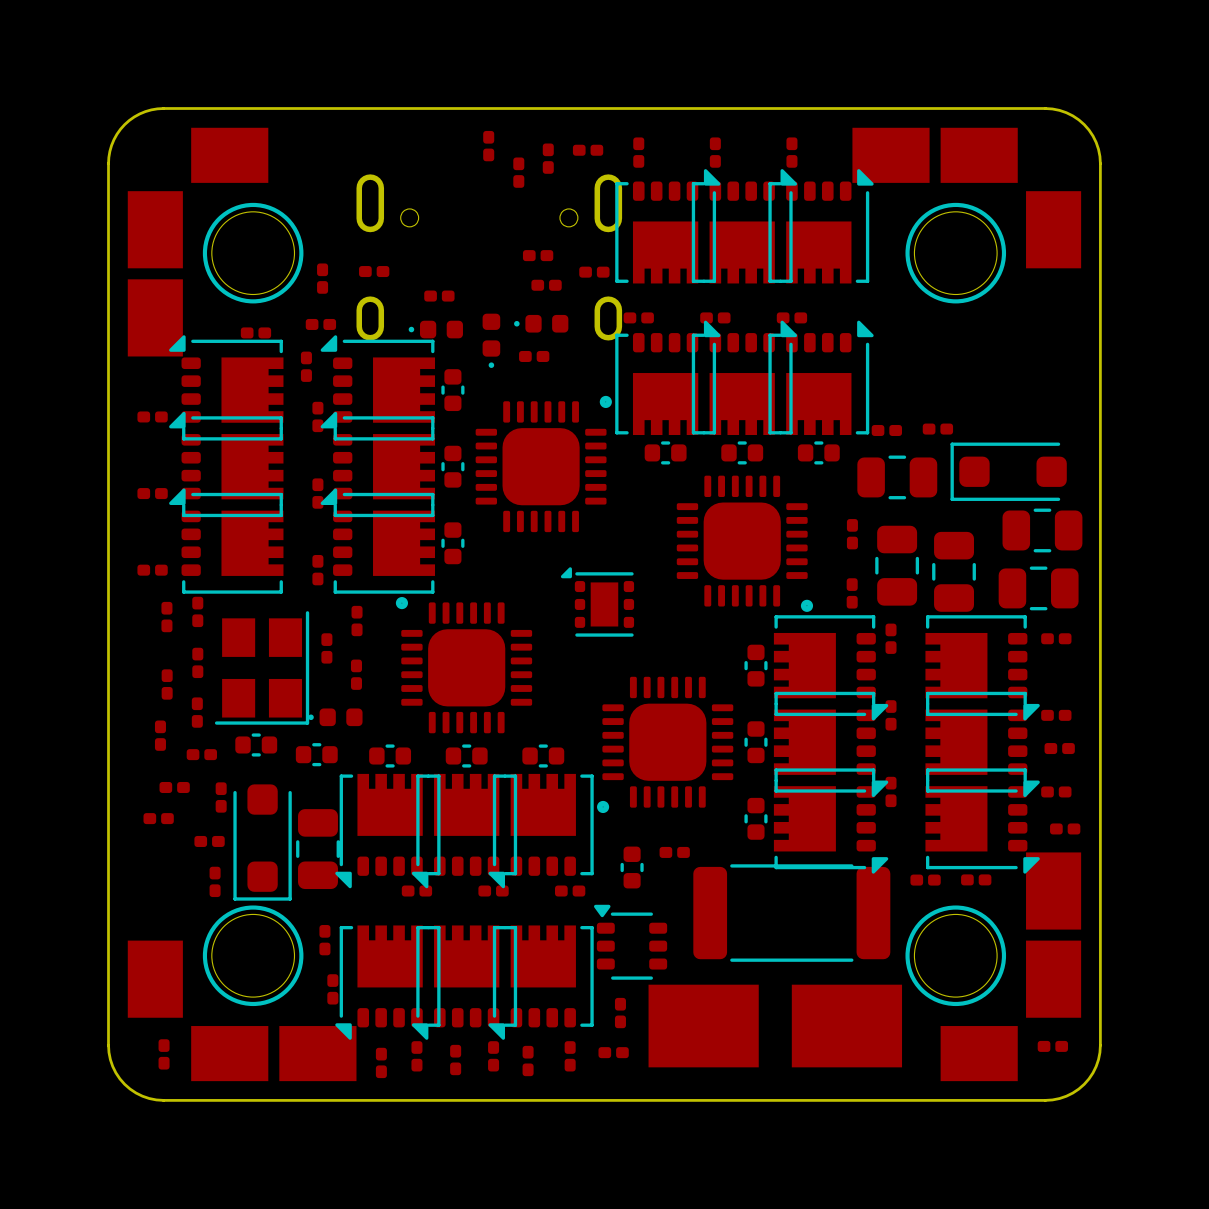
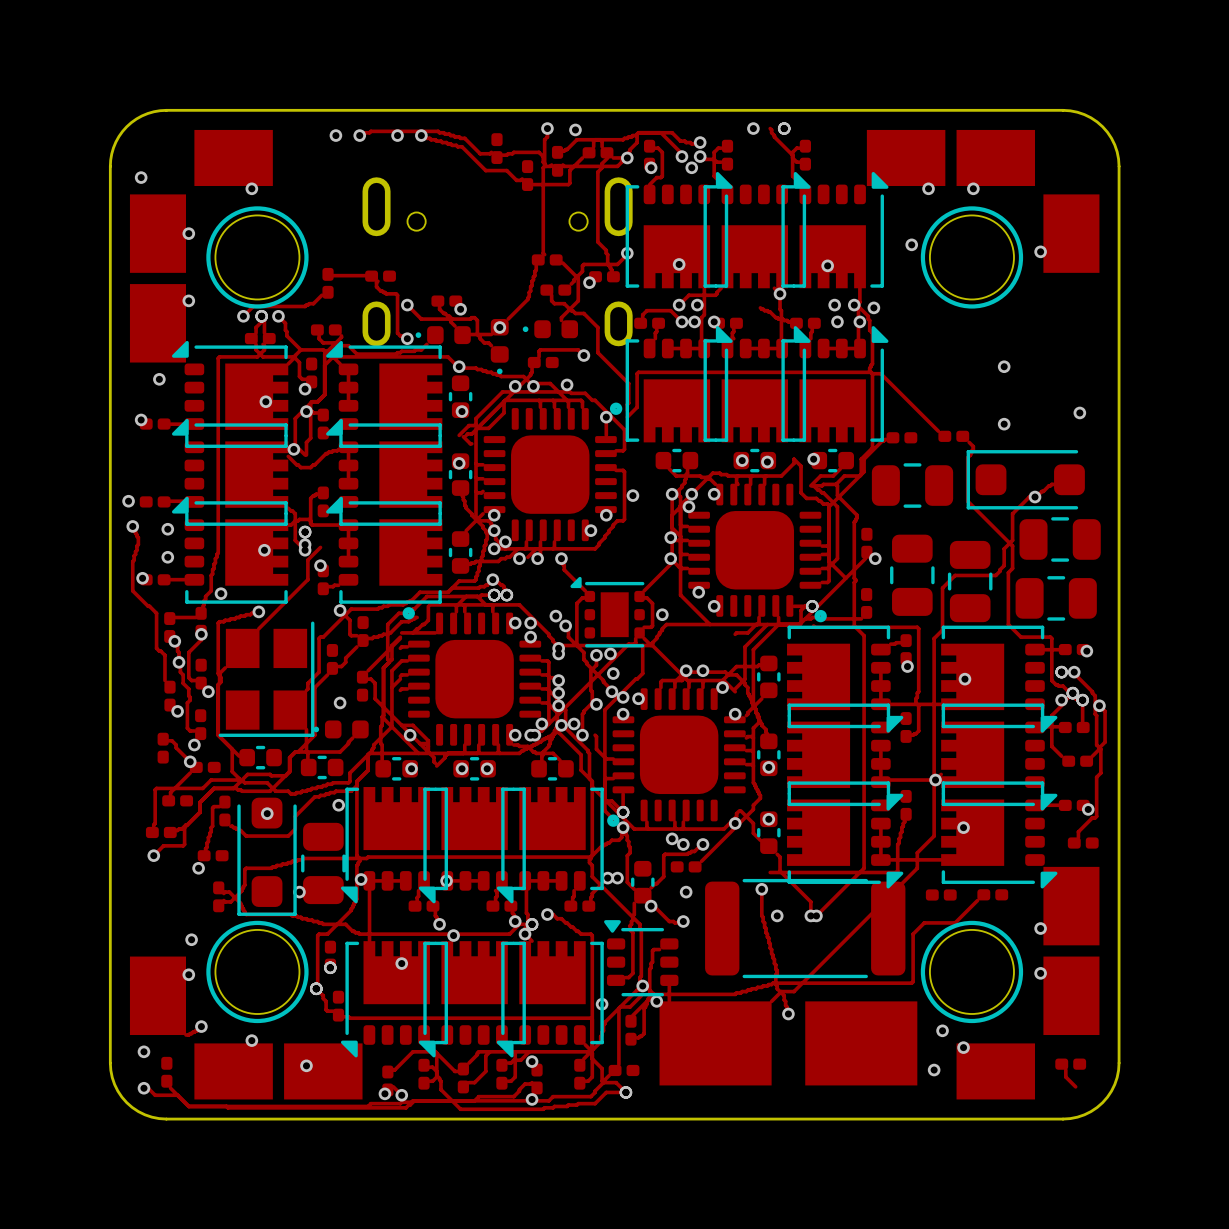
track: none -> (547, 128) (547, 136) (544, 139) (543, 167) (544, 254)
via: none -> (547, 128)
via: none -> (753, 128)
track: none -> (770, 128) (774, 136) (792, 155)
via: none -> (784, 128)
via: none -> (575, 129)
track: none -> (660, 132) (681, 153) (681, 156)
track: none -> (637, 134) (637, 142) (617, 166) (562, 164)
via: none -> (335, 135)
track: none -> (359, 135) (370, 131) (438, 131) (464, 138) (480, 153) (491, 152)
via: none -> (359, 135)
via: none -> (397, 135)
track: none -> (421, 135) (461, 146) (485, 170) (506, 170) (516, 180) (522, 178)
via: none -> (421, 135)
track: none -> (595, 139) (593, 146)
track: none -> (600, 139) (602, 146)
track: none -> (700, 142) (691, 143) (680, 141) (672, 132) (638, 132) (623, 139) (576, 139) (567, 149) (562, 150)
via: none -> (700, 142)
track: none -> (655, 148) (662, 152) (662, 176) (656, 177) (649, 184)
track: none -> (721, 148) (714, 152) (714, 176) (722, 184)
track: none -> (799, 148) (792, 152) (792, 176) (801, 184)
track: none -> (502, 155) (513, 152) (539, 152) (543, 156) (544, 163)
via: none -> (681, 156)
track: none -> (700, 156) (721, 162)
via: none -> (700, 156)
track: none -> (582, 157) (569, 170) (568, 184) (533, 184)
track: none -> (607, 157) (597, 171) (597, 242) (606, 250) (607, 264) (611, 271)
track: none -> (613, 157) (627, 157)
via: none -> (627, 157)
track: none -> (792, 157) (799, 162)
track: none -> (544, 164) (551, 164)
via: none -> (651, 167)
via: none -> (691, 167)
via: none -> (141, 177)
via: none -> (251, 188)
via: none -> (928, 188)
via: none -> (973, 188)
via: none -> (188, 233)
via: none -> (911, 244)
via: none -> (1040, 251)
track: none -> (627, 253) (617, 264) (583, 264) (582, 271) (571, 284)
via: none -> (627, 253)
track: none -> (562, 263) (578, 278) (578, 300) (561, 317) (561, 320)
via: none -> (679, 264)
track: none -> (536, 265) (527, 299) (508, 319)
via: none -> (827, 265)
track: none -> (333, 275) (365, 275)
track: none -> (377, 281) (376, 286) (380, 291) (397, 295) (397, 333) (407, 338)
via: none -> (589, 282)
track: none -> (704, 288) (701, 338)
track: none -> (721, 288) (715, 295) (688, 295) (679, 305)
track: none -> (774, 288) (780, 293) (781, 338)
track: none -> (859, 288) (858, 338)
via: none -> (780, 293)
track: none -> (321, 295) (313, 303) (305, 306) (253, 306) (243, 316)
track: none -> (551, 295) (551, 300) (554, 303) (564, 303) (575, 313) (583, 313) (597, 327) (597, 352) (628, 383) (627, 410)
via: none -> (188, 300)
track: none -> (407, 305) (421, 319) (449, 319) (454, 326)
via: none -> (407, 305)
via: none -> (679, 305)
via: none -> (697, 305)
via: none -> (834, 305)
track: none -> (854, 305) (857, 305) (868, 316) (869, 320) (869, 330) (872, 333) (872, 363) (869, 370) (872, 373)
via: none -> (854, 305)
track: none -> (439, 306) (439, 309) (452, 319) (474, 317) (477, 320) (477, 334) (484, 342) (488, 342) (491, 345)
track: none -> (760, 307) (770, 312) (778, 319) (789, 321)
via: none -> (873, 307)
via: none -> (460, 309)
via: none -> (243, 316)
via: none -> (261, 316)
track: none -> (278, 316) (285, 323) (286, 335) (300, 349)
via: none -> (278, 316)
track: none -> (642, 317) (646, 310) (670, 310) (681, 321)
via: none -> (681, 321)
via: none -> (694, 321)
via: none -> (714, 321)
via: none -> (837, 321)
via: none -> (859, 321)
via: none -> (499, 327)
track: none -> (656, 328) (655, 338)
track: none -> (733, 328) (733, 338)
track: none -> (812, 328) (810, 338)
track: none -> (256, 333) (256, 327) (261, 321) (261, 316) (264, 319) (264, 333)
track: none -> (470, 334) (491, 334)
track: none -> (319, 335) (323, 342) (348, 345) (356, 354) (396, 354) (401, 351) (421, 349) (426, 344)
track: none -> (341, 335) (324, 354) (324, 394) (317, 401) (312, 401) (295, 418) (295, 445) (305, 454)
via: none -> (407, 338)
track: none -> (256, 344) (256, 349) (263, 356) (293, 356) (299, 362) (299, 376) (302, 379) (306, 379)
track: none -> (263, 344) (264, 349) (257, 356) (218, 358) (218, 553) (211, 575) (211, 590) (205, 596) (202, 606)
track: none -> (673, 348) (680, 348)
track: none -> (691, 348) (698, 348)
track: none -> (752, 348) (757, 348)
track: none -> (770, 348) (775, 348)
track: none -> (829, 348) (836, 348)
track: none -> (847, 348) (854, 348)
track: none -> (300, 349) (327, 351) (340, 363)
track: none -> (300, 349) (288, 363)
track: none -> (583, 355) (578, 349) (540, 349) (539, 356)
via: none -> (583, 355)
track: none -> (324, 365) (333, 356) (447, 356) (459, 368) (476, 368) (501, 376) (523, 376) (530, 383) (550, 383) (568, 401) (568, 407)
via: none -> (459, 366)
via: none -> (1004, 366)
track: none -> (532, 368) (530, 375) (471, 433) (466, 435)
track: none -> (871, 372) (638, 372) (637, 407) (627, 417)
track: none -> (872, 373) (872, 447) (861, 459) (861, 474)
track: none -> (872, 373) (880, 373) (938, 431)
track: none -> (348, 375) (348, 382)
via: none -> (159, 379)
via: none -> (567, 384)
via: none -> (515, 386)
via: none -> (533, 386)
via: none -> (305, 389)
track: none -> (348, 393) (348, 400)
track: none -> (505, 400) (581, 400) (582, 407)
track: none -> (539, 400) (540, 407)
track: none -> (553, 400) (554, 407)
via: none -> (265, 401)
track: none -> (504, 401) (504, 412) (488, 428) (477, 428)
track: none -> (310, 403) (310, 438) (306, 442) (306, 454)
track: none -> (306, 411) (317, 412)
via: none -> (306, 411)
via: none -> (461, 411)
via: none -> (1079, 412)
track: none -> (606, 417) (606, 435)
via: none -> (606, 417)
via: none -> (141, 419)
track: none -> (170, 424) (184, 424)
via: none -> (1004, 424)
track: none -> (476, 429) (476, 519)
track: none -> (459, 435) (469, 425) (476, 424) (476, 418) (502, 391) (585, 393) (592, 400) (595, 400) (624, 429) (624, 449) (616, 450)
track: none -> (463, 436) (471, 443)
track: none -> (886, 439) (882, 440) (864, 459) (864, 471) (829, 506)
track: none -> (969, 442) (973, 449) (967, 457) (967, 501) (1012, 546) (1012, 568) (1008, 572) (1008, 624) (1020, 637) (1051, 638) (1051, 680) (1056, 684) (1063, 686) (1075, 698) (1082, 700) (1082, 722)
via: none -> (293, 449)
track: none -> (338, 449) (326, 453) (310, 467) (300, 467) (288, 456)
track: none -> (348, 453) (348, 459)
via: none -> (813, 459)
via: none -> (742, 460)
via: none -> (767, 461)
via: none -> (459, 463)
track: none -> (476, 463) (483, 464)
track: none -> (669, 469) (676, 476) (707, 477) (715, 484)
track: none -> (687, 469) (684, 483) (679, 490) (680, 595) (709, 624)
track: none -> (840, 469) (833, 476) (820, 476) (810, 485)
track: none -> (616, 470) (624, 471) (624, 519) (617, 520) (613, 525) (595, 548) (494, 548)
track: none -> (348, 471) (348, 477)
track: none -> (737, 476) (737, 484)
track: none -> (752, 476) (750, 484)
track: none -> (766, 476) (764, 484)
track: none -> (859, 476) (844, 476) (836, 484)
track: none -> (476, 477) (483, 478)
track: none -> (836, 484) (837, 495) (857, 515) (854, 522) (854, 625) (864, 635) (864, 868) (816, 915)
track: none -> (836, 484) (812, 485)
track: none -> (1054, 484) (1049, 485) (1039, 494) (1029, 497) (1012, 513) (1012, 540) (1004, 548) (1004, 565) (995, 575) (955, 575) (942, 588) (942, 630) (934, 638) (934, 836) (917, 852) (917, 868) (794, 991) (781, 991) (771, 1001)
track: none -> (813, 485) (837, 506) (837, 558) (827, 568) (822, 568)
track: none -> (476, 491) (483, 491)
track: none -> (317, 494) (310, 498) (310, 523) (338, 525)
track: none -> (672, 494) (672, 562) (644, 590)
via: none -> (672, 494)
via: none -> (691, 494)
via: none -> (714, 494)
track: none -> (461, 495) (466, 508) (487, 533) (476, 579) (459, 581) (447, 592) (419, 592) (411, 600) (403, 604) (389, 604) (377, 609) (351, 609) (323, 637) (319, 638) (319, 672) (307, 683) (306, 690)
via: none -> (632, 495)
via: none -> (1035, 497)
via: none -> (128, 501)
track: none -> (170, 501) (184, 501)
track: none -> (680, 505) (712, 473) (728, 476) (781, 476) (794, 463) (794, 459) (801, 466) (801, 492) (806, 498) (816, 498) (829, 505) (829, 581) (822, 582)
track: none -> (680, 506) (672, 515)
via: none -> (688, 506)
track: none -> (288, 508) (295, 513) (295, 540) (305, 550)
track: none -> (483, 513) (466, 530)
via: none -> (494, 515)
via: none -> (606, 515)
track: none -> (310, 520) (299, 519) (288, 525)
track: none -> (477, 520) (488, 520) (495, 530) (495, 539) (505, 548)
track: none -> (680, 525) (687, 526)
track: none -> (132, 526) (138, 537) (138, 544) (132, 561) (132, 590) (156, 613) (156, 648) (164, 655) (164, 680)
via: none -> (132, 526)
track: none -> (672, 527) (680, 536)
via: none -> (167, 529)
track: none -> (348, 530) (348, 537)
via: none -> (494, 530)
via: none -> (590, 530)
via: none -> (305, 532)
track: none -> (670, 537) (673, 540) (687, 540)
via: none -> (670, 537)
via: none -> (505, 541)
track: none -> (526, 541) (525, 548)
track: none -> (540, 541) (540, 555) (537, 558)
track: none -> (554, 541) (553, 548)
via: none -> (305, 544)
track: none -> (822, 546) (829, 547)
track: none -> (320, 547) (307, 560) (307, 579) (258, 628)
track: none -> (348, 548) (348, 555)
via: none -> (494, 548)
track: none -> (518, 548) (509, 557) (501, 558) (498, 561) (476, 561) (469, 564)
track: none -> (536, 548) (527, 557)
via: none -> (264, 550)
via: none -> (305, 550)
track: none -> (680, 553) (687, 554)
track: none -> (829, 553) (822, 554)
via: none -> (167, 557)
via: none -> (519, 558)
via: none -> (537, 558)
track: none -> (561, 558) (564, 569) (585, 590)
via: none -> (561, 558)
track: none -> (670, 558) (679, 567) (687, 568)
via: none -> (670, 558)
track: none -> (865, 558) (799, 624) (666, 624) (651, 645) (557, 645) (519, 604) (429, 604)
via: none -> (875, 558)
track: none -> (829, 561) (845, 578)
via: none -> (320, 565)
via: none -> (142, 578)
track: none -> (170, 579) (184, 579)
via: none -> (492, 579)
track: none -> (338, 585) (328, 586)
track: none -> (452, 588) (478, 588) (490, 582) (498, 582) (504, 586) (506, 595)
via: none -> (698, 592)
via: none -> (221, 593)
track: none -> (494, 595) (426, 596) (414, 609) (405, 613) (398, 613) (387, 624) (389, 662)
via: none -> (494, 595)
via: none -> (506, 595)
track: none -> (466, 596) (456, 606) (456, 611)
track: none -> (477, 596) (485, 604)
track: none -> (585, 597) (582, 597) (576, 603) (578, 645)
track: none -> (644, 597) (646, 597) (652, 603) (652, 625) (644, 627)
track: none -> (463, 604) (464, 611)
track: none -> (491, 604) (492, 611)
track: none -> (428, 606) (428, 620) (412, 632)
via: none -> (714, 606)
track: none -> (794, 606) (812, 606)
track: none -> (805, 606) (801, 610) (801, 623)
via: none -> (812, 606)
track: none -> (340, 610) (349, 620) (349, 634) (356, 635)
via: none -> (340, 610)
track: none -> (258, 611) (218, 623) (219, 674)
via: none -> (258, 611)
via: none -> (662, 614)
via: none -> (555, 616)
track: none -> (174, 617) (195, 617)
track: none -> (417, 617) (408, 621) (401, 621) (387, 634) (368, 638)
track: none -> (759, 617) (757, 624)
track: none -> (778, 617) (780, 624)
track: none -> (805, 618) (861, 618)
via: none -> (515, 623)
via: none -> (530, 623)
track: none -> (756, 624) (747, 632) (735, 634)
track: none -> (767, 624) (745, 646) (745, 679) (735, 688)
track: none -> (778, 624) (753, 649) (754, 707)
track: none -> (565, 625) (568, 628) (568, 637) (583, 652) (583, 659) (586, 663) (611, 691)
via: none -> (565, 625)
track: none -> (813, 625) (918, 628) (918, 691) (915, 698) (915, 702) (918, 705) (918, 730) (911, 735)
track: none -> (401, 632) (435, 632)
via: none -> (201, 634)
track: none -> (201, 637) (201, 639) (188, 652) (188, 677) (191, 680) (195, 680)
track: none -> (400, 637) (391, 645) (391, 659) (383, 667) (383, 718) (418, 753)
via: none -> (530, 637)
track: none -> (400, 638) (368, 670)
track: none -> (635, 638) (634, 644) (628, 644) (541, 730) (534, 735)
track: none -> (644, 638) (687, 680) (723, 680) (735, 691)
via: none -> (174, 641)
track: none -> (174, 642) (180, 658) (180, 672) (183, 674) (183, 683) (188, 688) (190, 697) (187, 702) (187, 728) (190, 730) (194, 730)
track: none -> (900, 642) (890, 644)
track: none -> (642, 645) (642, 673) (604, 709) (604, 810) (625, 831) (630, 847) (630, 852) (627, 855) (627, 882) (634, 889)
track: none -> (356, 646) (345, 658) (345, 662) (338, 666)
track: none -> (407, 646) (400, 648)
via: none -> (558, 648)
track: none -> (1044, 649) (1058, 649)
via: none -> (1086, 651)
via: none -> (558, 653)
via: none -> (610, 653)
track: none -> (596, 655) (596, 665) (590, 670) (592, 702) (582, 714) (582, 735)
via: none -> (596, 655)
track: none -> (407, 660) (401, 660) (391, 670) (391, 726) (373, 745) (372, 750) (349, 773) (348, 782) (333, 782) (291, 794) (288, 791) (275, 791) (267, 782) (244, 782) (239, 780)
track: none -> (541, 660) (548, 662) (548, 723)
via: none -> (178, 662)
track: none -> (760, 665) (736, 666) (722, 680)
via: none -> (907, 666)
track: none -> (225, 667) (219, 673) (219, 683)
track: none -> (686, 670) (674, 681) (674, 687)
via: none -> (686, 670)
via: none -> (702, 670)
via: none -> (1061, 672)
track: none -> (1074, 672) (1095, 695) (1096, 745) (1100, 749) (1100, 773) (1096, 777) (1096, 816) (1092, 817) (1078, 831) (1078, 837)
via: none -> (1074, 672)
via: none -> (613, 673)
track: none -> (880, 673) (880, 680)
track: none -> (327, 674) (314, 687) (314, 735) (298, 752)
track: none -> (407, 674) (400, 676)
track: none -> (541, 674) (555, 677) (558, 680)
track: none -> (219, 676) (221, 681) (218, 684) (218, 735) (239, 756)
track: none -> (368, 679) (375, 683) (375, 698) (433, 757) (435, 763)
track: none -> (400, 679) (391, 687)
via: none -> (964, 679)
via: none -> (558, 680)
track: none -> (690, 680) (688, 687)
track: none -> (704, 680) (702, 687)
track: none -> (660, 687) (662, 680) (681, 680) (690, 672) (725, 672) (728, 674) (736, 674) (747, 687) (747, 693) (759, 718)
via: none -> (722, 687)
track: none -> (407, 688) (400, 690)
track: none -> (541, 688) (547, 688) (565, 709) (565, 728) (588, 750) (589, 778)
via: none -> (208, 691)
via: none -> (611, 691)
track: none -> (880, 691) (880, 698)
via: none -> (558, 693)
track: none -> (1072, 693) (1051, 715) (1051, 746) (1061, 756)
via: none -> (1072, 693)
via: none -> (623, 697)
via: none -> (638, 698)
track: none -> (761, 698) (746, 715)
via: none -> (1061, 700)
via: none -> (1082, 700)
via: none -> (340, 702)
track: none -> (541, 702) (547, 702) (557, 712) (557, 726) (554, 733) (519, 753) (369, 753)
via: none -> (596, 704)
track: none -> (890, 704) (941, 704)
via: none -> (558, 705)
track: none -> (1099, 705) (1105, 711) (1105, 742) (1092, 756)
via: none -> (1099, 705)
via: none -> (177, 711)
via: none -> (623, 714)
via: none -> (735, 714)
track: none -> (383, 715) (380, 726) (382, 760)
track: none -> (757, 715) (759, 722) (753, 728) (753, 782) (760, 798) (753, 805) (753, 809) (701, 861)
track: none -> (759, 719) (767, 733)
via: none -> (541, 723)
via: none -> (574, 723)
track: none -> (401, 725) (412, 725) (428, 740) (428, 752)
via: none -> (561, 725)
track: none -> (1044, 726) (1058, 726)
track: none -> (306, 729) (307, 759)
via: none -> (410, 735)
via: none -> (515, 735)
via: none -> (530, 735)
via: none -> (534, 735)
via: none -> (582, 735)
track: none -> (595, 735) (596, 749) (606, 759) (613, 759)
track: none -> (352, 737) (340, 752) (295, 752) (289, 757) (289, 771) (270, 791) (214, 788) (200, 802) (200, 812) (184, 827) (184, 844) (163, 845) (153, 855)
track: none -> (746, 737) (753, 737)
track: none -> (169, 740) (176, 745) (176, 747) (190, 761)
track: none -> (419, 743) (425, 743) (428, 746)
via: none -> (194, 745)
track: none -> (464, 745) (463, 753)
track: none -> (478, 745) (477, 753)
track: none -> (498, 745) (499, 753)
track: none -> (513, 745) (527, 746) (536, 753) (553, 753) (560, 760)
track: none -> (232, 749) (232, 771) (239, 780)
track: none -> (746, 750) (753, 752)
track: none -> (880, 752) (880, 757)
track: none -> (447, 753) (436, 766)
track: none -> (368, 754) (368, 770) (356, 781) (356, 855) (359, 858) (356, 865) (356, 899) (351, 910) (327, 934) (317, 935) (316, 988) (326, 1001) (326, 1009) (333, 1011)
track: none -> (541, 760) (543, 752) (548, 746) (555, 732) (558, 732) (581, 754) (581, 770) (592, 781) (592, 855)
via: none -> (190, 761)
track: none -> (746, 764) (753, 766)
via: none -> (768, 767)
via: none -> (411, 768)
via: none -> (461, 768)
via: none -> (487, 768)
track: none -> (880, 770) (880, 775)
track: none -> (190, 773) (170, 792) (170, 795)
track: none -> (941, 774) (935, 780) (890, 780)
track: none -> (285, 775) (247, 774) (233, 788)
track: none -> (613, 778) (604, 780)
track: none -> (239, 780) (211, 780) (202, 788) (156, 788) (153, 826)
via: none -> (935, 780)
track: none -> (356, 785) (351, 791) (335, 791) (314, 796) (295, 816) (295, 829) (288, 836) (246, 836) (240, 830) (230, 826)
track: none -> (592, 787) (634, 829) (723, 829) (739, 810)
track: none -> (623, 794) (623, 812) (611, 801) (606, 801)
via: none -> (338, 805)
track: none -> (1044, 805) (1058, 805)
track: none -> (219, 806) (212, 808) (212, 826) (205, 850)
via: none -> (1088, 809)
track: none -> (740, 810) (753, 823) (753, 833) (760, 840)
via: none -> (623, 812)
via: none -> (267, 813)
via: none -> (768, 819)
track: none -> (904, 820) (897, 844) (896, 872) (770, 872)
track: none -> (646, 822) (648, 829)
track: none -> (674, 822) (676, 829)
track: none -> (683, 822) (681, 829)
via: none -> (735, 823)
track: none -> (187, 824) (176, 830)
track: none -> (623, 827) (623, 833) (618, 840) (611, 840) (600, 847) (590, 857)
via: none -> (623, 827)
via: none -> (963, 827)
track: none -> (880, 829) (880, 836)
via: none -> (672, 838)
via: none -> (683, 844)
track: none -> (702, 844) (687, 854) (665, 854) (663, 876) (651, 887)
via: none -> (702, 844)
track: none -> (880, 847) (880, 854)
track: none -> (777, 854) (780, 857) (780, 871) (810, 901) (810, 915)
via: none -> (153, 855)
track: none -> (590, 857) (589, 862) (592, 865) (592, 876) (639, 924) (639, 980) (653, 994)
track: none -> (590, 857) (303, 858) (271, 868) (246, 868) (244, 885) (242, 890) (230, 901) (223, 900)
track: none -> (890, 859) (941, 859)
via: none -> (198, 868)
track: none -> (607, 878) (592, 893) (590, 900)
via: none -> (607, 878)
via: none -> (617, 878)
via: none -> (361, 879)
track: none -> (375, 880) (382, 880)
track: none -> (393, 880) (400, 880)
via: none -> (446, 880)
track: none -> (453, 880) (459, 880)
track: none -> (471, 880) (477, 880)
track: none -> (530, 880) (537, 880)
track: none -> (548, 880) (555, 880)
track: none -> (761, 889) (761, 915) (777, 970) (775, 984) (784, 995) (788, 1013)
via: none -> (761, 889)
track: none -> (369, 890) (369, 941)
track: none -> (418, 890) (417, 900)
track: none -> (495, 890) (495, 900)
track: none -> (526, 890) (527, 925) (525, 928) (525, 934) (532, 941)
track: none -> (574, 890) (572, 900)
via: none -> (299, 892)
via: none -> (686, 892)
track: none -> (223, 893) (229, 892) (240, 903) (246, 914) (291, 914) (323, 924) (345, 924) (352, 931) (359, 934) (509, 934) (519, 924) (532, 924)
track: none -> (977, 900) (955, 922) (924, 922) (913, 934) (911, 983) (773, 983) (735, 994) (653, 994)
track: none -> (634, 903) (634, 914) (630, 925) (630, 929) (632, 932) (632, 973) (625, 977)
track: none -> (651, 903) (669, 921) (683, 921)
via: none -> (651, 906)
track: none -> (435, 911) (436, 921) (439, 924)
track: none -> (512, 911) (515, 921)
track: none -> (547, 914) (553, 914) (557, 918) (561, 918) (581, 934) (592, 935) (592, 1050)
via: none -> (547, 914)
via: none -> (777, 915)
via: none -> (810, 915)
via: none -> (816, 915)
via: none -> (515, 921)
via: none -> (683, 921)
via: none -> (439, 924)
via: none -> (532, 924)
via: none -> (1040, 928)
via: none -> (525, 934)
via: none -> (453, 935)
via: none -> (191, 939)
track: none -> (659, 949) (652, 950) (648, 999)
via: none -> (401, 963)
via: none -> (330, 967)
via: none -> (1040, 973)
via: none -> (188, 974)
track: none -> (642, 985) (604, 1022) (600, 1042) (583, 1058)
via: none -> (642, 985)
track: none -> (669, 985) (669, 1001)
via: none -> (316, 988)
track: none -> (653, 994) (632, 1015)
track: none -> (641, 995) (630, 1006) (620, 1006)
track: none -> (646, 1001) (644, 1008) (644, 1033) (637, 1037)
via: none -> (656, 1001)
via: none -> (602, 1004)
track: none -> (618, 1008) (618, 1064)
via: none -> (788, 1013)
track: none -> (344, 1016) (592, 1019)
track: none -> (201, 1026) (197, 1030) (186, 1035)
via: none -> (201, 1026)
via: none -> (942, 1030)
via: none -> (251, 1040)
track: none -> (428, 1044) (454, 1071) (457, 1071)
track: none -> (585, 1044) (590, 1051)
via: none -> (963, 1047)
via: none -> (143, 1051)
track: none -> (435, 1051) (412, 1051) (393, 1070)
track: none -> (490, 1051) (485, 1056) (485, 1071) (474, 1082) (469, 1082)
track: none -> (529, 1051) (520, 1060) (513, 1060) (508, 1063)
track: none -> (590, 1051) (592, 1077) (585, 1081)
track: none -> (590, 1051) (478, 1051) (469, 1063)
track: none -> (436, 1053) (436, 1077) (429, 1081)
track: none -> (515, 1053) (515, 1077) (508, 1081)
track: none -> (592, 1058) (602, 1068) (603, 1082) (616, 1082) (625, 1092) (606, 1092) (595, 1103) (578, 1103) (543, 1109) (460, 1109) (440, 1089) (440, 1081) (436, 1075)
via: none -> (532, 1061)
via: none -> (306, 1065)
track: none -> (429, 1067) (436, 1071)
via: none -> (934, 1070)
track: none -> (1065, 1070) (1065, 1077) (1075, 1086)
track: none -> (609, 1075) (590, 1096) (553, 1096) (548, 1100) (412, 1100) (400, 1103) (370, 1103) (368, 1106) (188, 1106) (170, 1088)
track: none -> (532, 1082) (525, 1084) (513, 1096) (478, 1096) (474, 1100)
track: none -> (393, 1086) (401, 1095)
track: none -> (143, 1088) (148, 1088) (155, 1095) (177, 1095)
via: none -> (143, 1088)
via: none -> (625, 1092)
via: none -> (384, 1093)
via: none -> (401, 1095)
via: none -> (532, 1099)
track: none -> (414, 1100) (405, 1107) (226, 1106)

